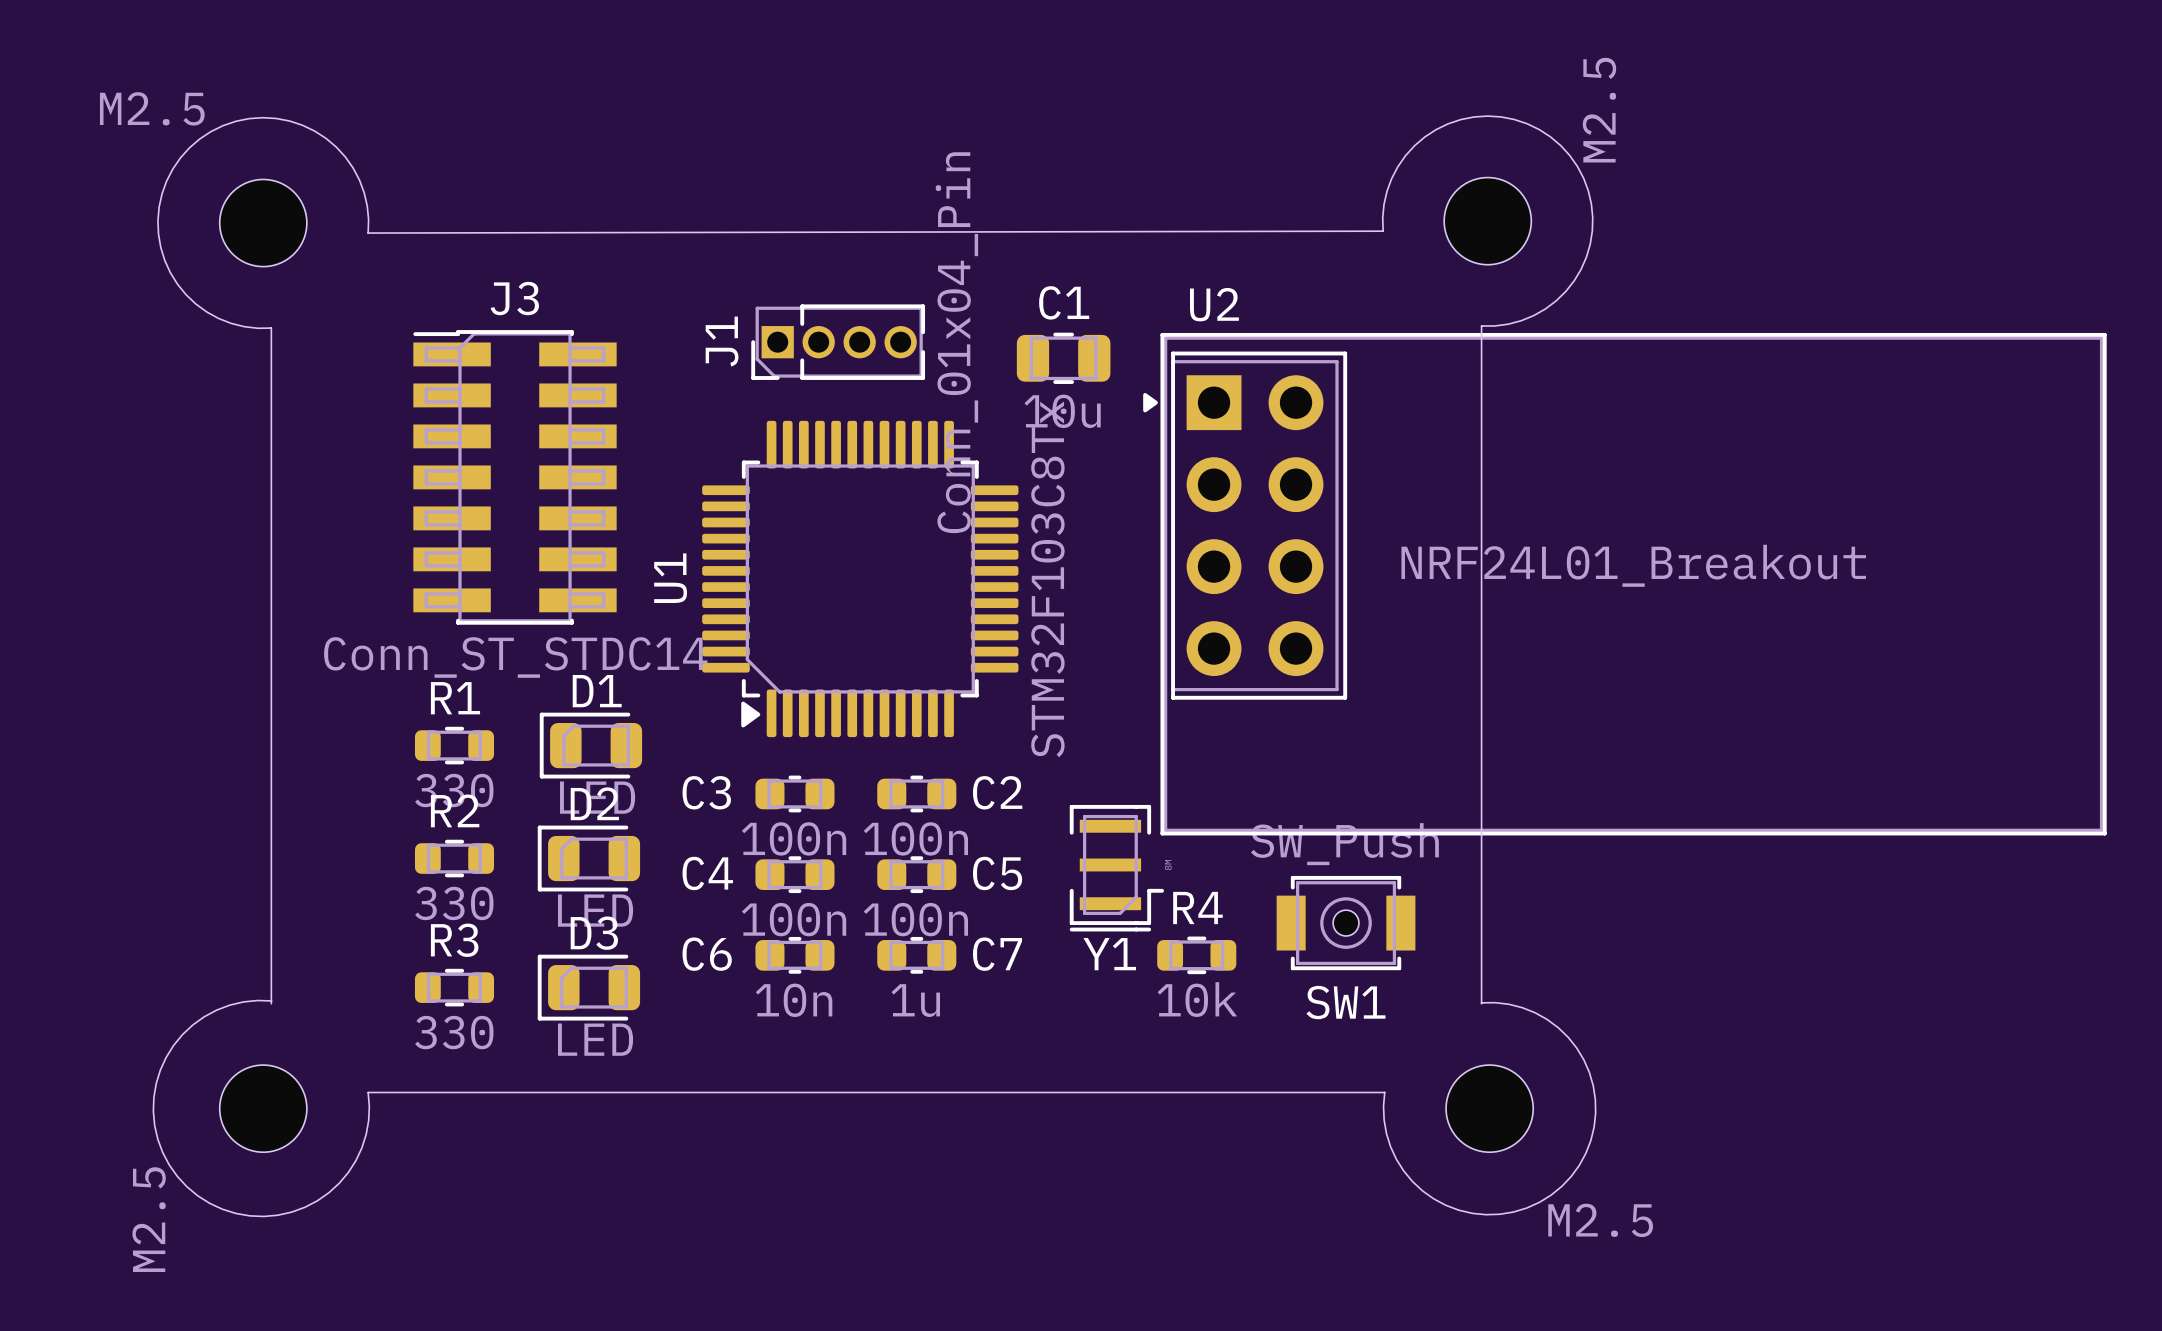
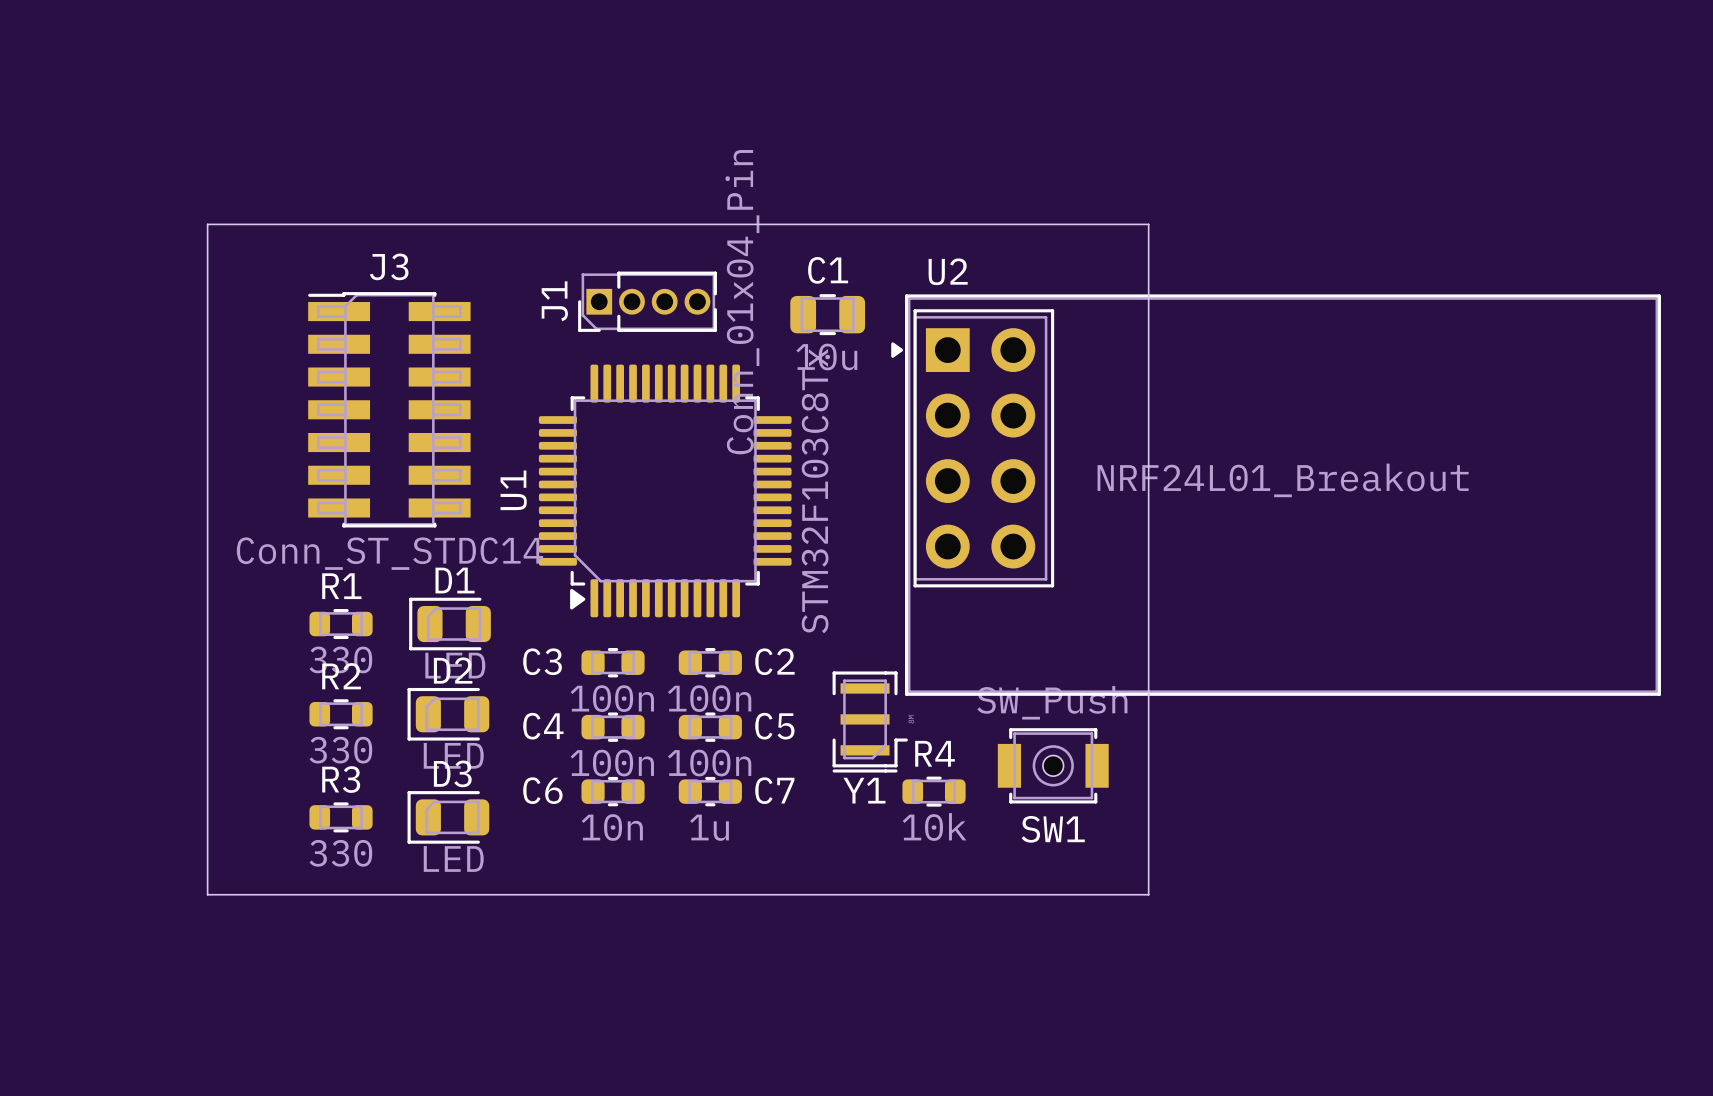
part: M2.5 (1487, 221) -> none
part: M2.5 (263, 223) -> none
board edge: none -> (207, 224) (1148, 224) (1148, 894) (207, 894) (207, 224)
board edge: (271, 1000) (243, 1001) (229, 1005) (216, 1010) (192, 1024) (173, 1045) (166, 1057) (160, 1070) (153, 1097) (153, 1111) (157, 1139) (162, 1152) (177, 1176) (197, 1195) (209, 1203) (222, 1209) (249, 1215) (263, 1216) (291, 1212) (317, 1200) (339, 1183) (355, 1160) (366, 1134) (368, 1120) (368, 1092) (1384, 1092) (1384, 1120) (1390, 1146) (1403, 1170) (1422, 1190) (1433, 1198) (1458, 1210) (1486, 1214) (1513, 1212) (1539, 1202) (1551, 1195) (1561, 1186) (1579, 1165) (1590, 1140) (1594, 1126) (1595, 1113) (1593, 1085) (1583, 1059) (1568, 1037) (1558, 1027) (1535, 1012) (1522, 1007) (1508, 1004) (1481, 1002) -> none
board edge: (271, 1003) (271, 327) (244, 326) (231, 323) (206, 311) (195, 304) (177, 284) (164, 260) (160, 247) (157, 220) (162, 193) (172, 169) (189, 147) (199, 139) (223, 125) (249, 118) (276, 118) (302, 125) (314, 131) (336, 147) (353, 168) (364, 192) (367, 206) (368, 233) (1383, 231) (1384, 204) (1391, 178) (1405, 155) (1414, 145) (1436, 129) (1448, 123) (1460, 119) (1487, 116) (1514, 119) (1527, 123) (1539, 129) (1560, 145) (1569, 155) (1583, 178) (1591, 204) (1592, 217) (1590, 244) (1586, 257) (1574, 280) (1565, 291) (1545, 308) (1533, 315) (1508, 324) (1481, 326) (1481, 1003) -> none
part: M2.5 (263, 1108) -> none
part: M2.5 (1489, 1108) -> none

